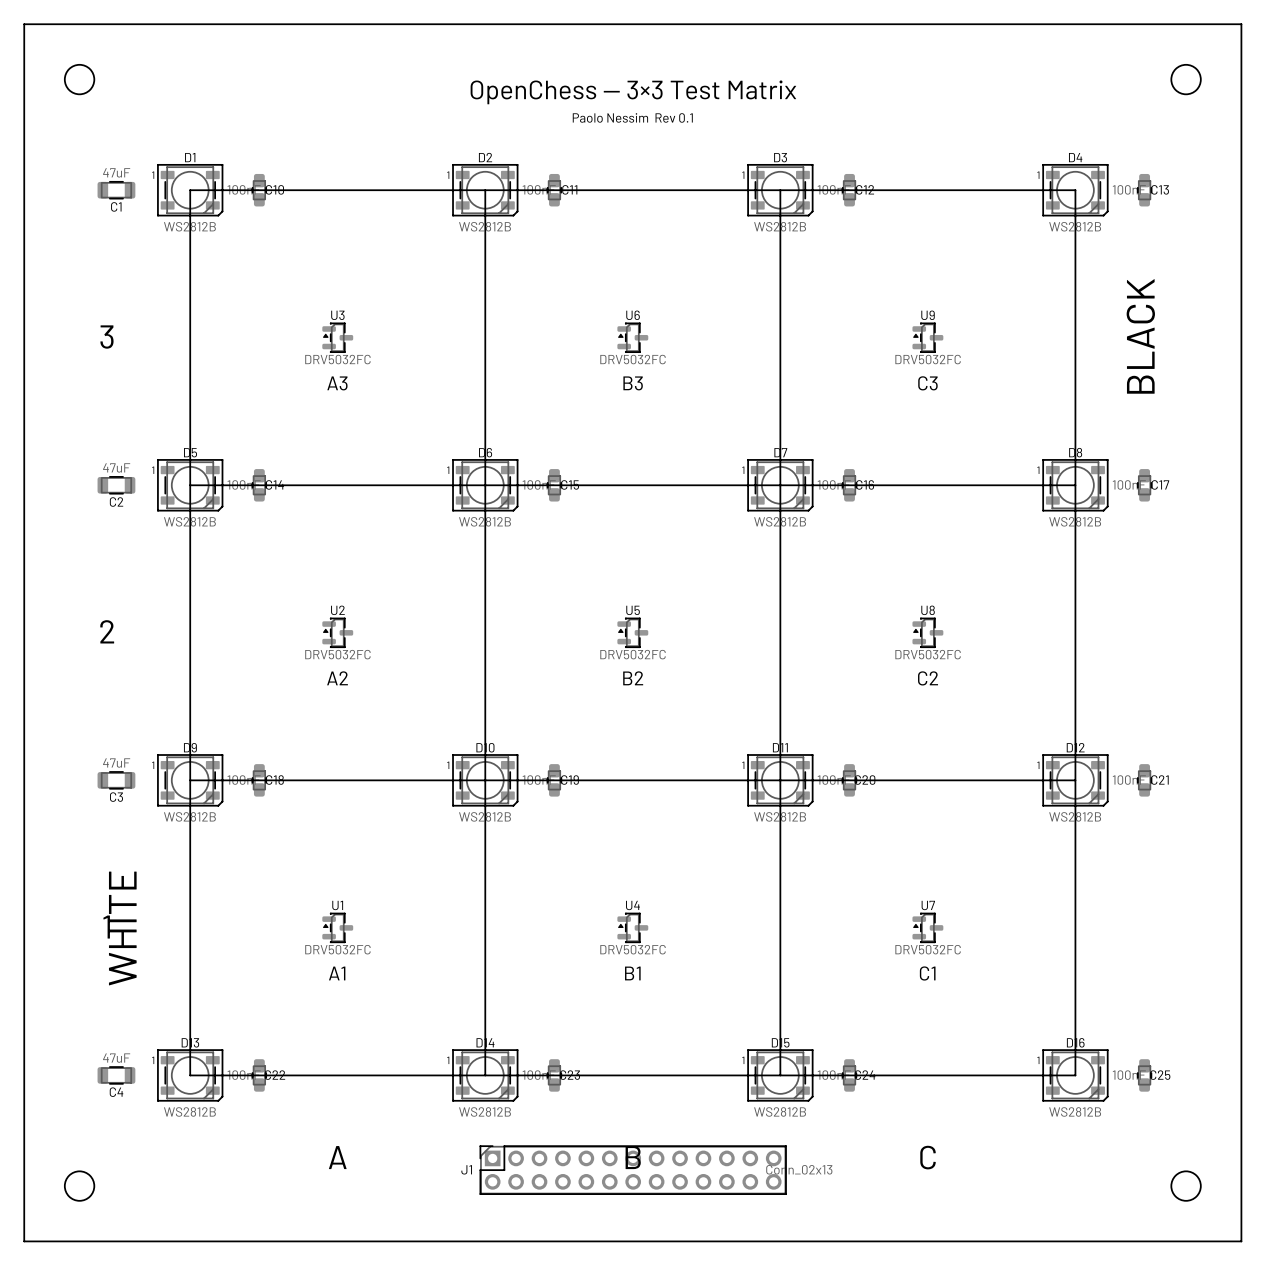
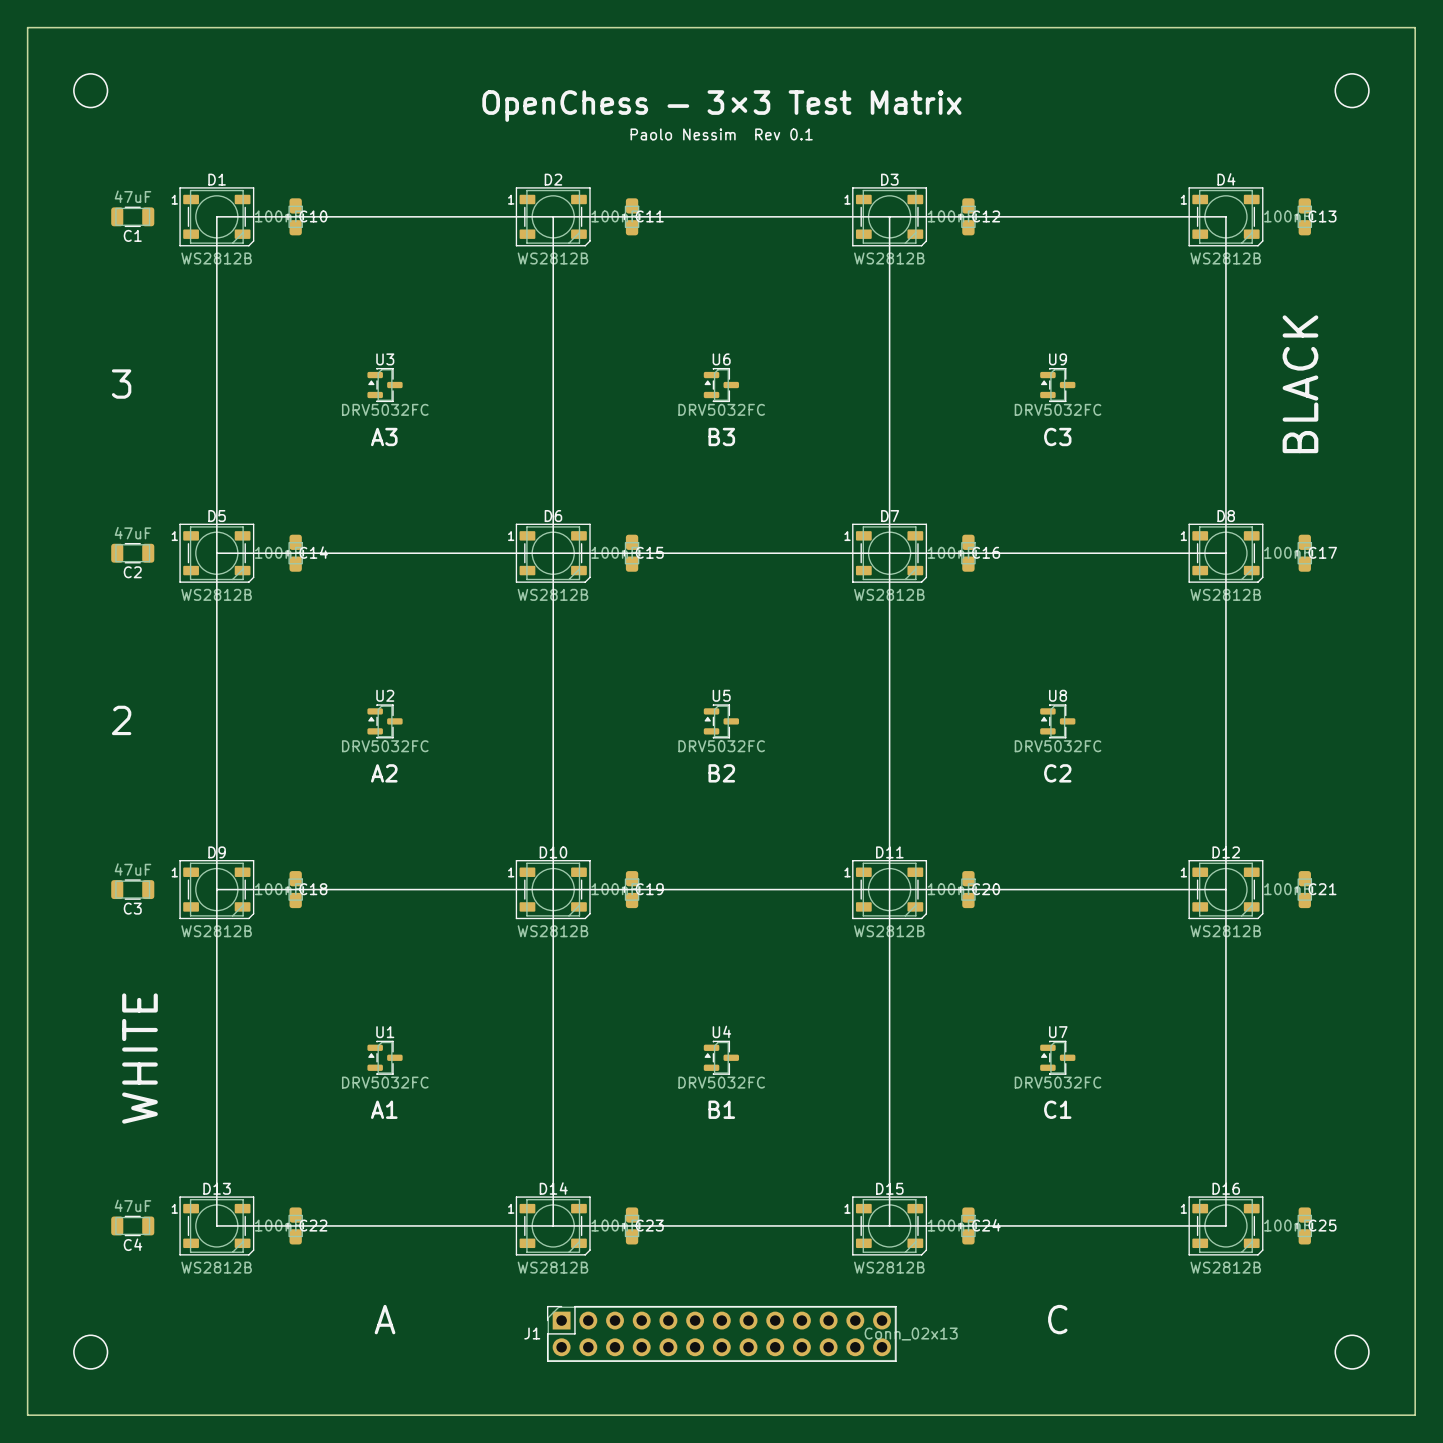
text: 1 (106, 927) -> none
text: B (633, 1157) -> none

